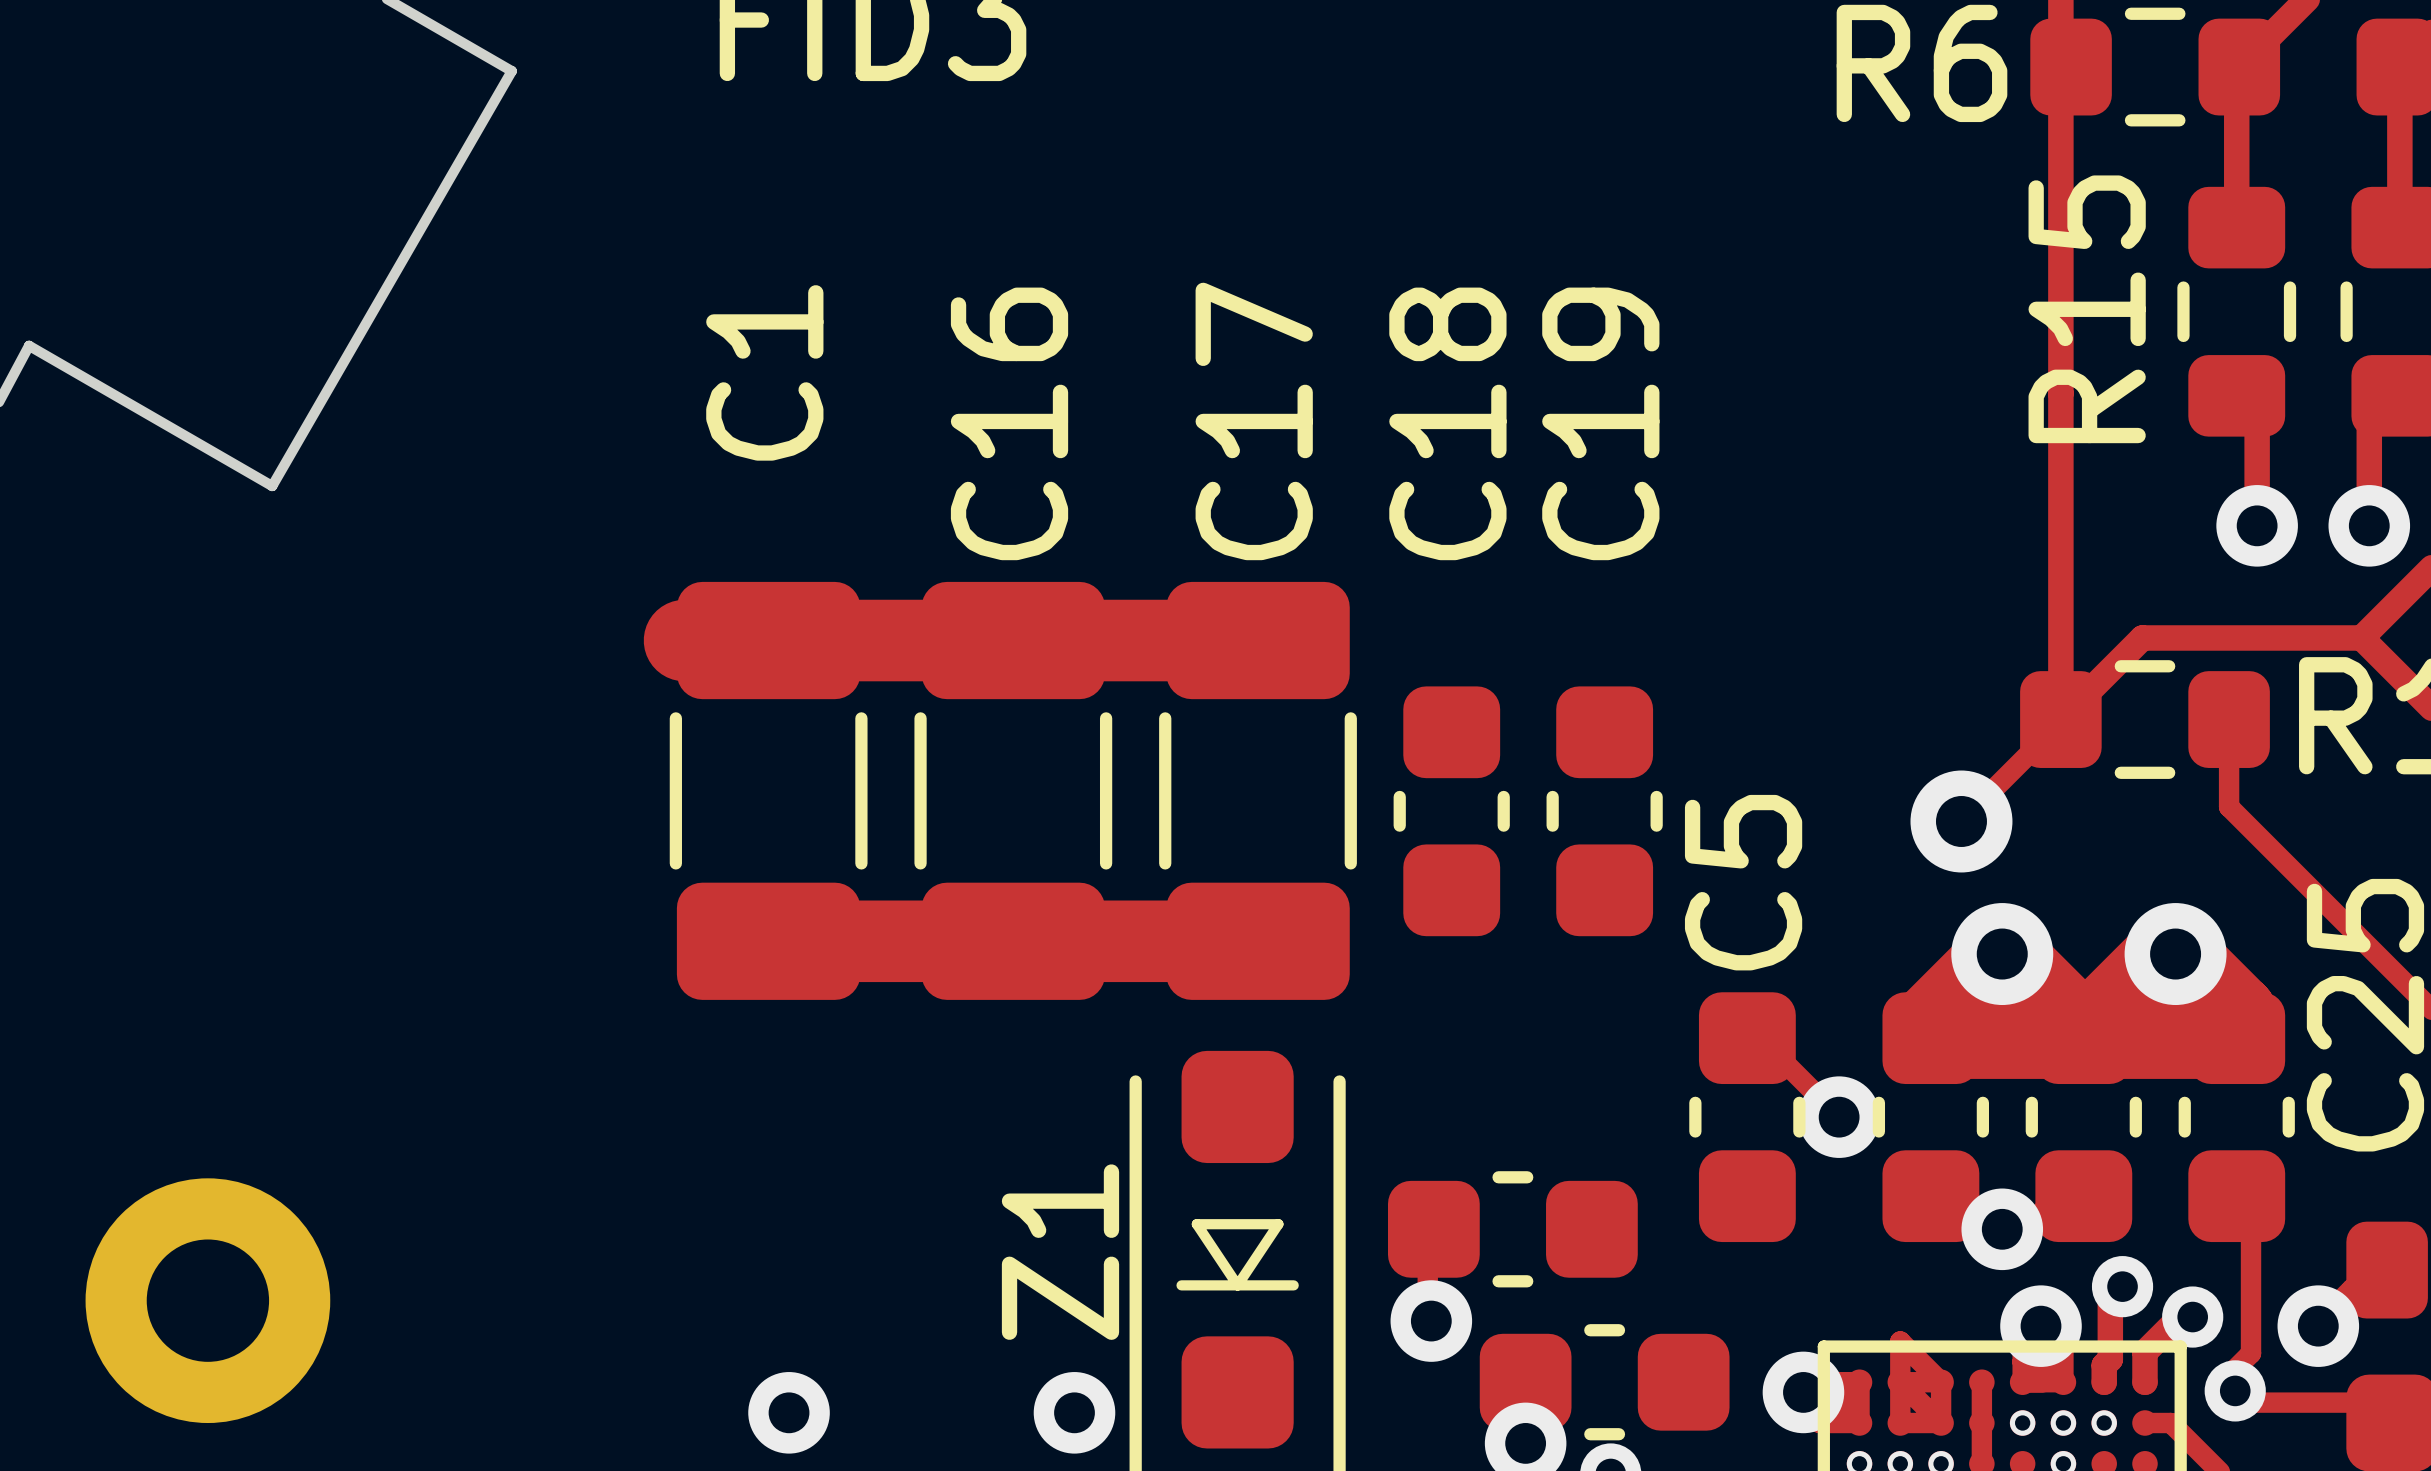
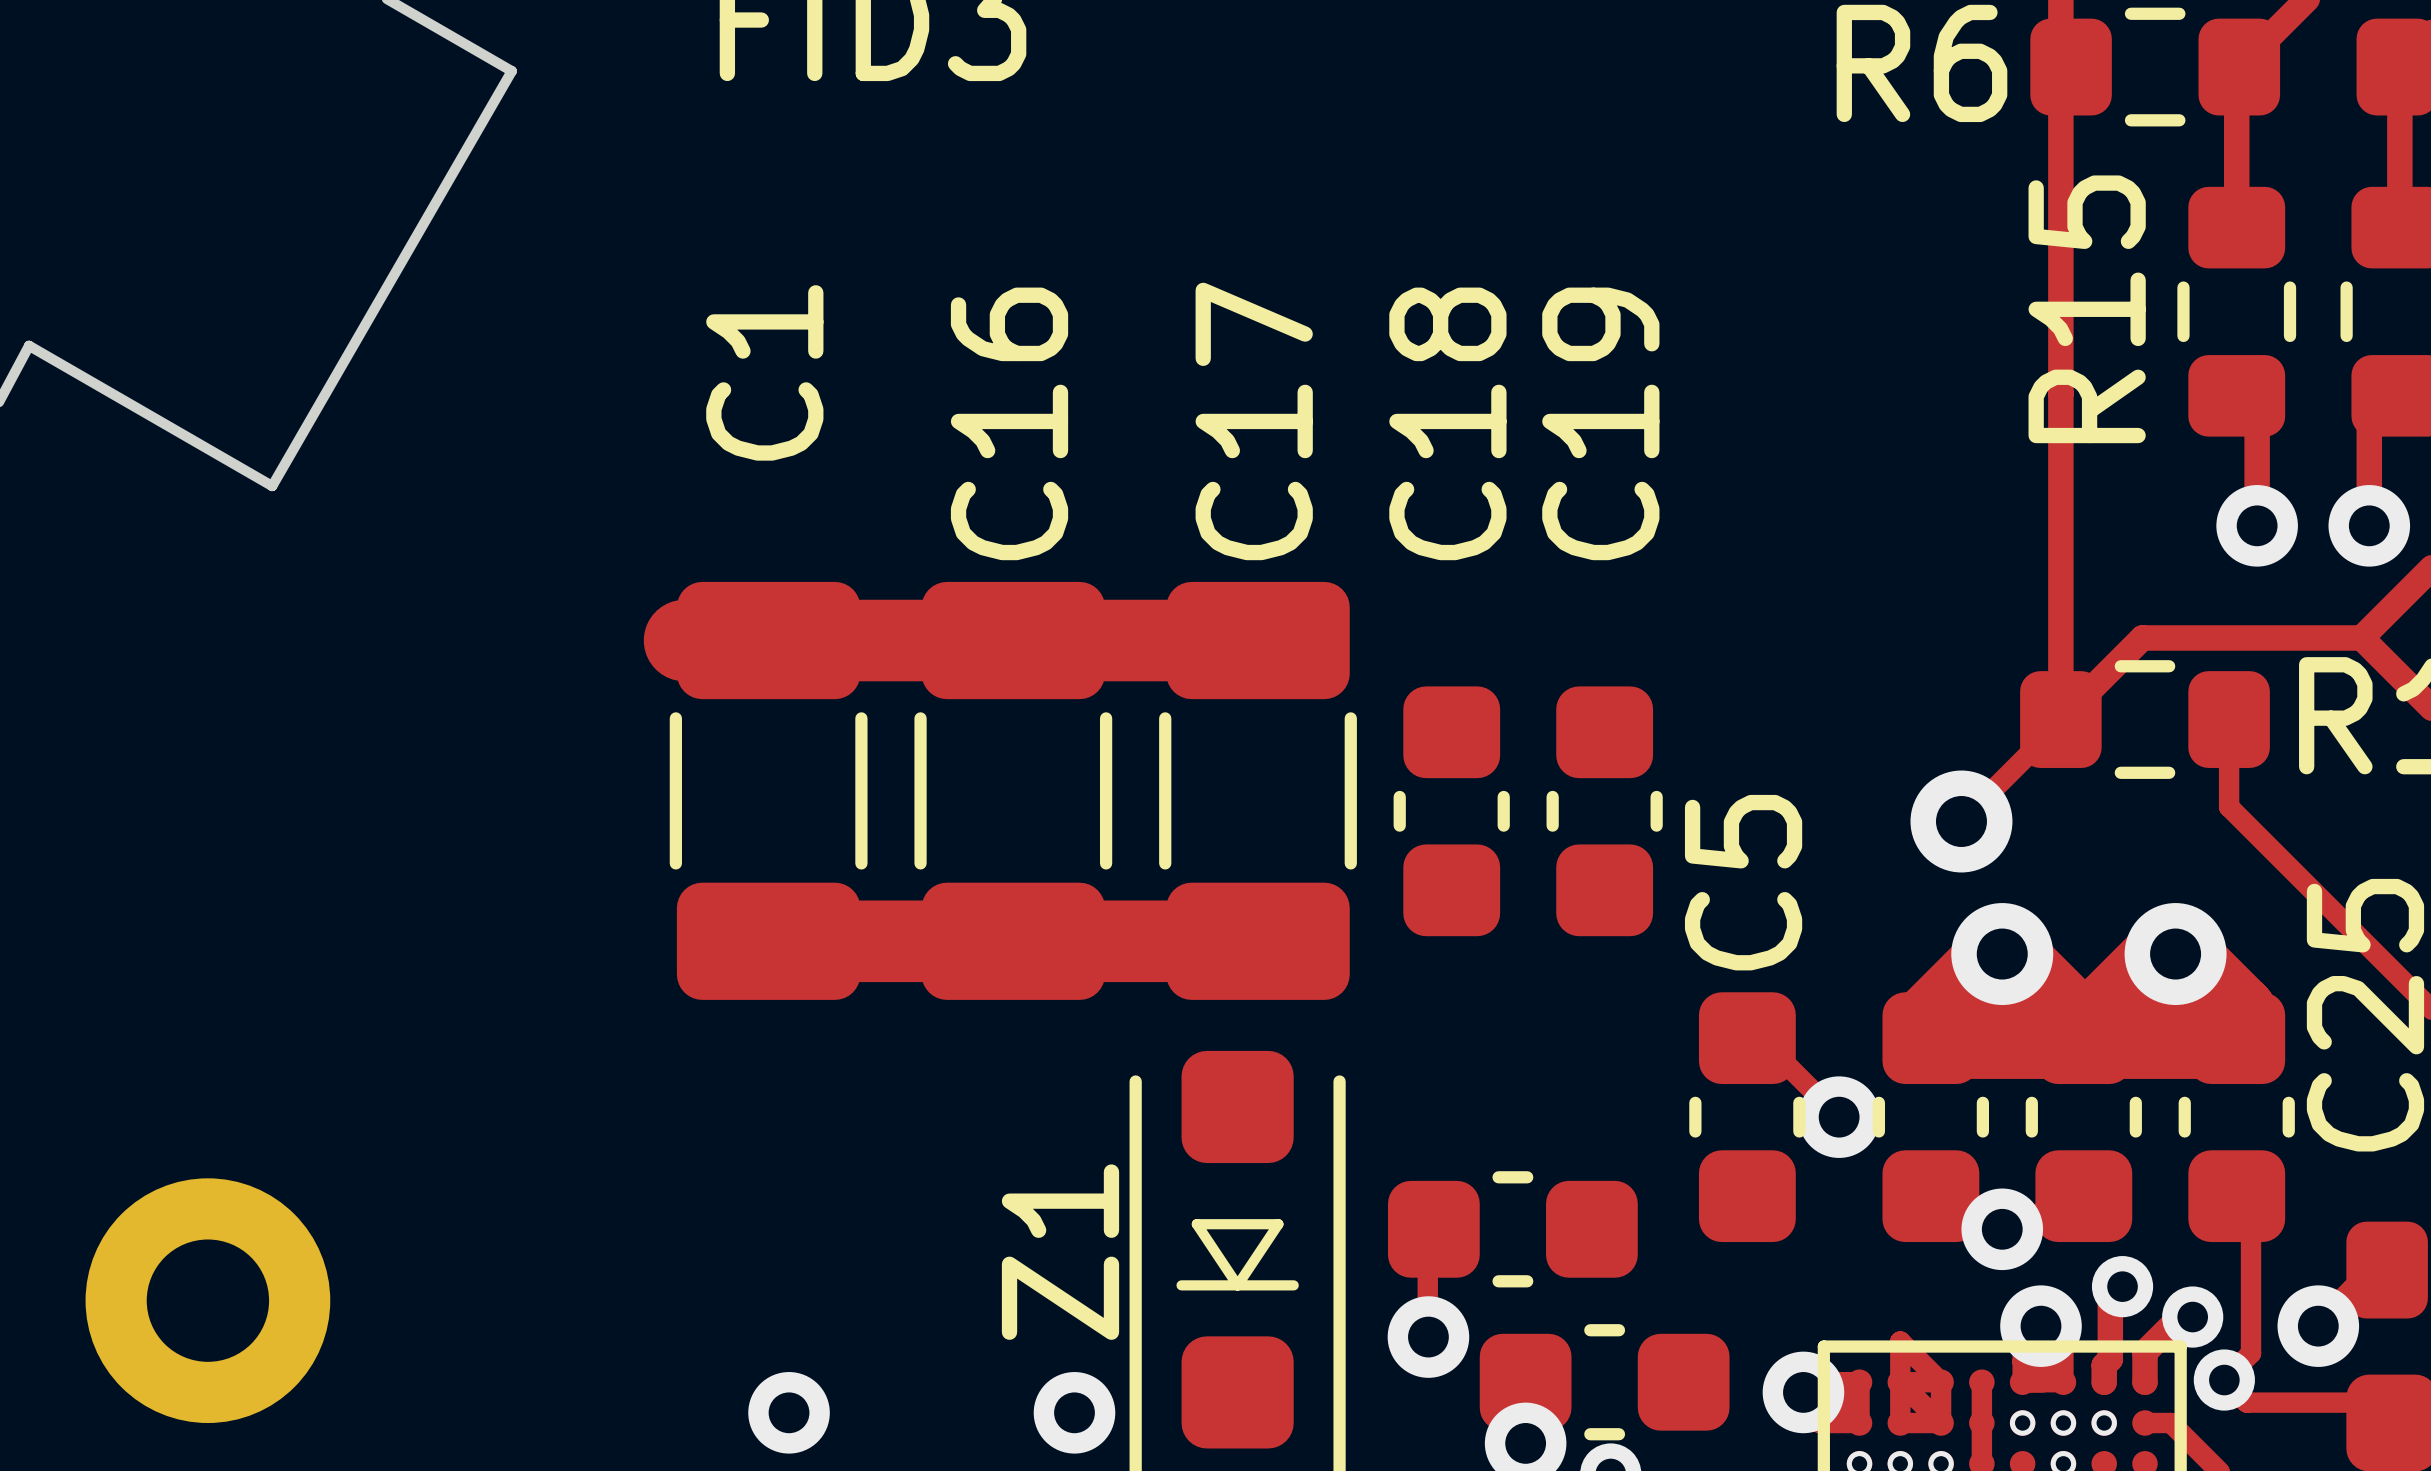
via position: (1431, 1321) -> (1428, 1337)
via position: (2235, 1390) -> (2224, 1380)

